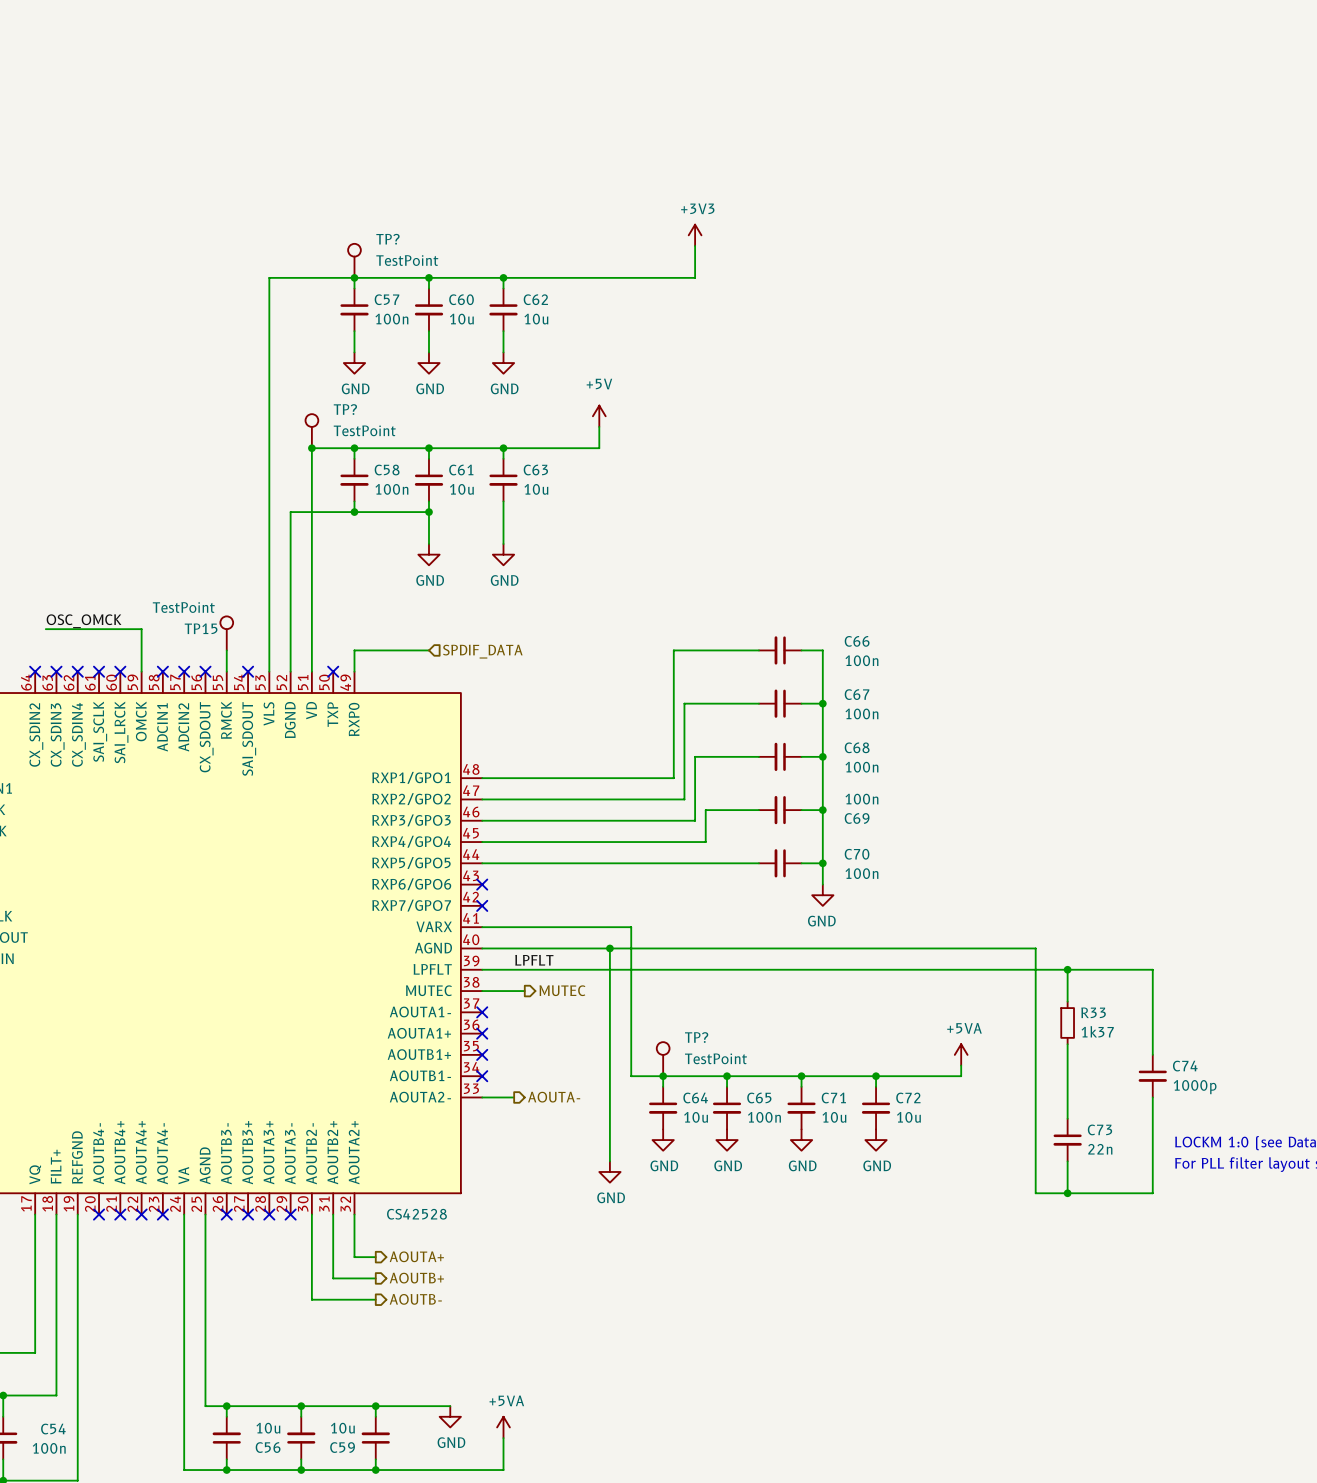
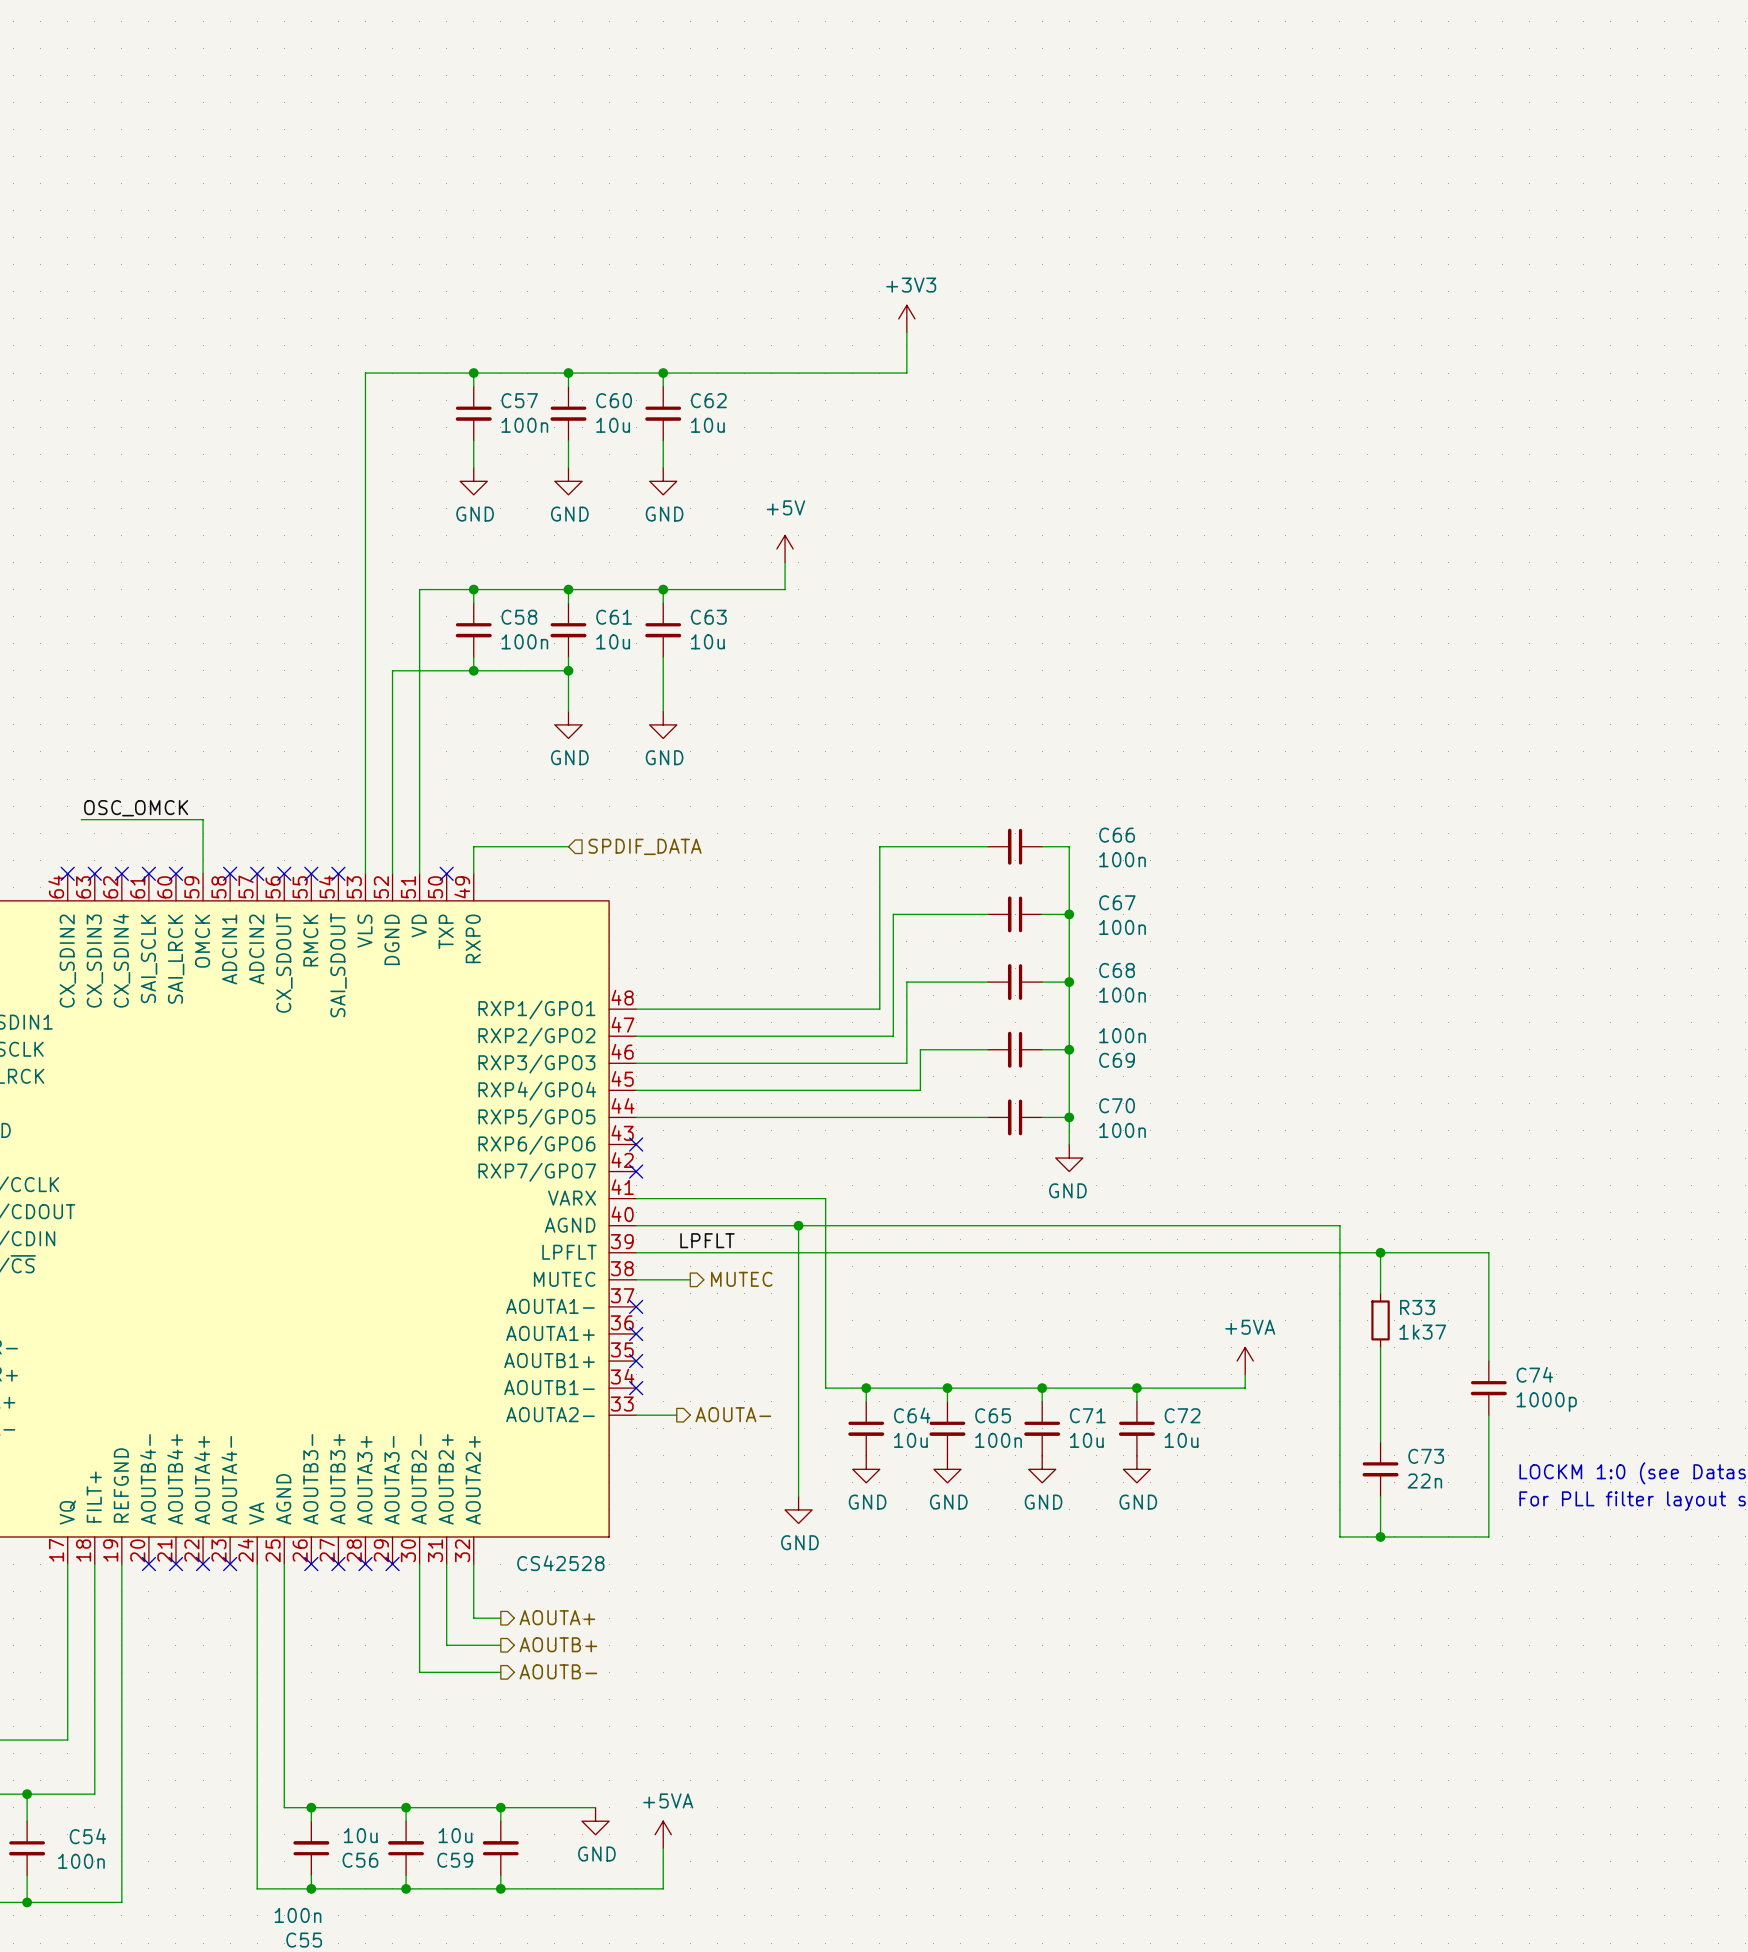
TP?: TestPoint (354, 260) -> none
TP?: TestPoint (311, 431) -> none
junction: (311, 448) -> none
TP15: TestPoint (226, 633) -> none
wire: (226, 650) (226, 671) -> none
no-connect mark: none -> (311, 873)
TP?: TestPoint (663, 1059) -> none

